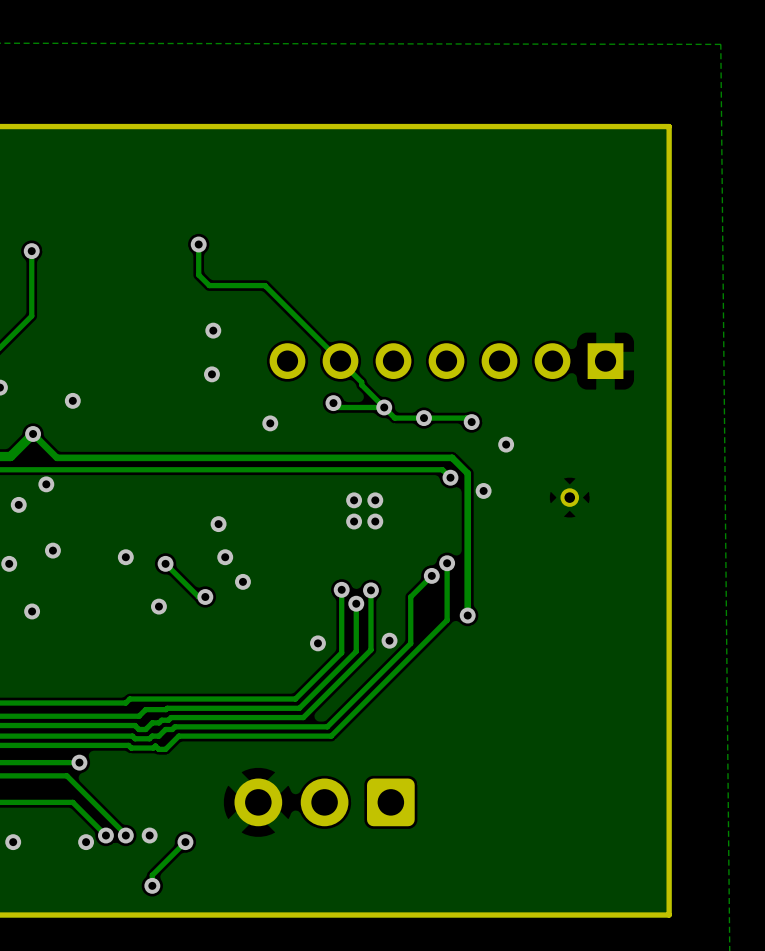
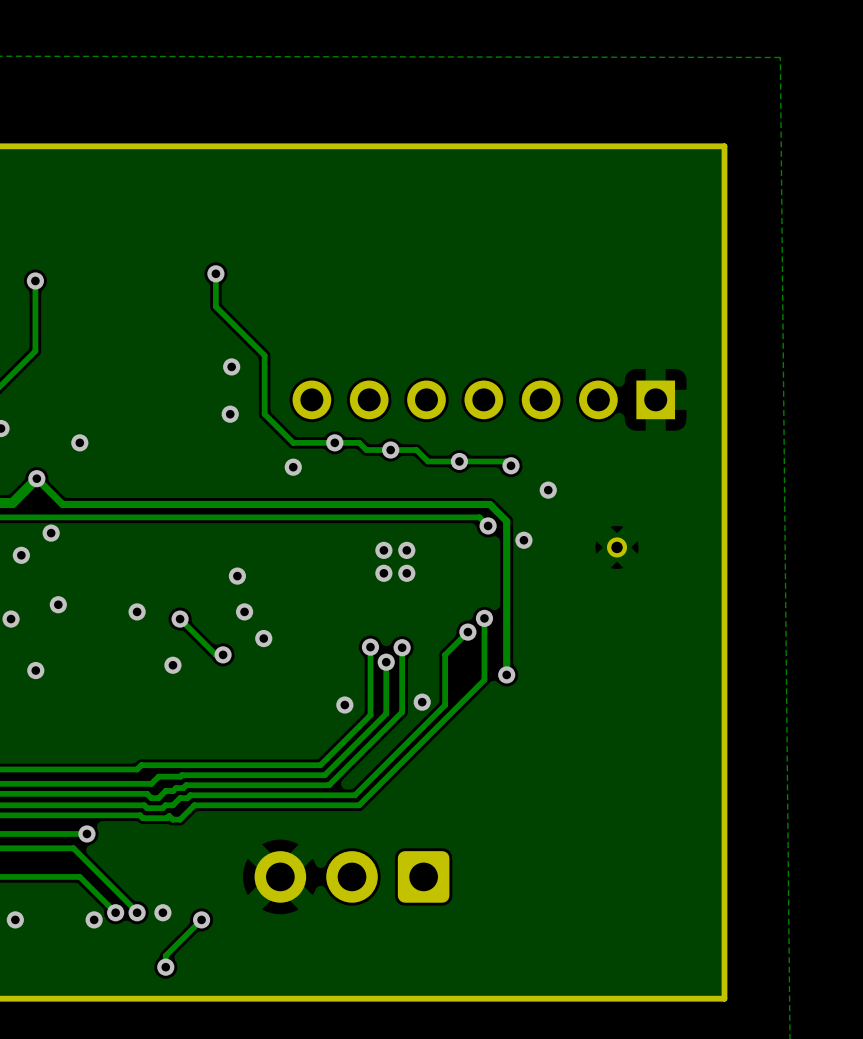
track: (209, 285) (264, 285) (361, 382) (361, 384) (384, 407) -> (227, 318) (264, 355) (264, 414) (293, 442) (359, 442) (361, 445)
via: none -> (334, 442)
via: (333, 403) -> none
via: none -> (390, 450)
via: (384, 407) -> none

